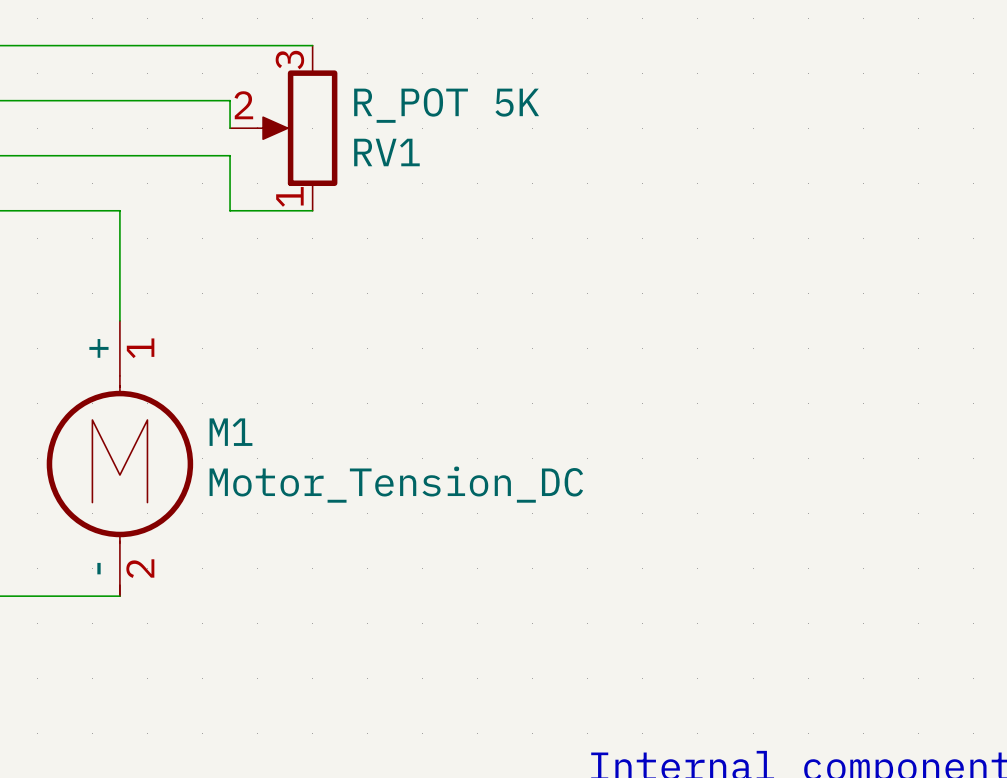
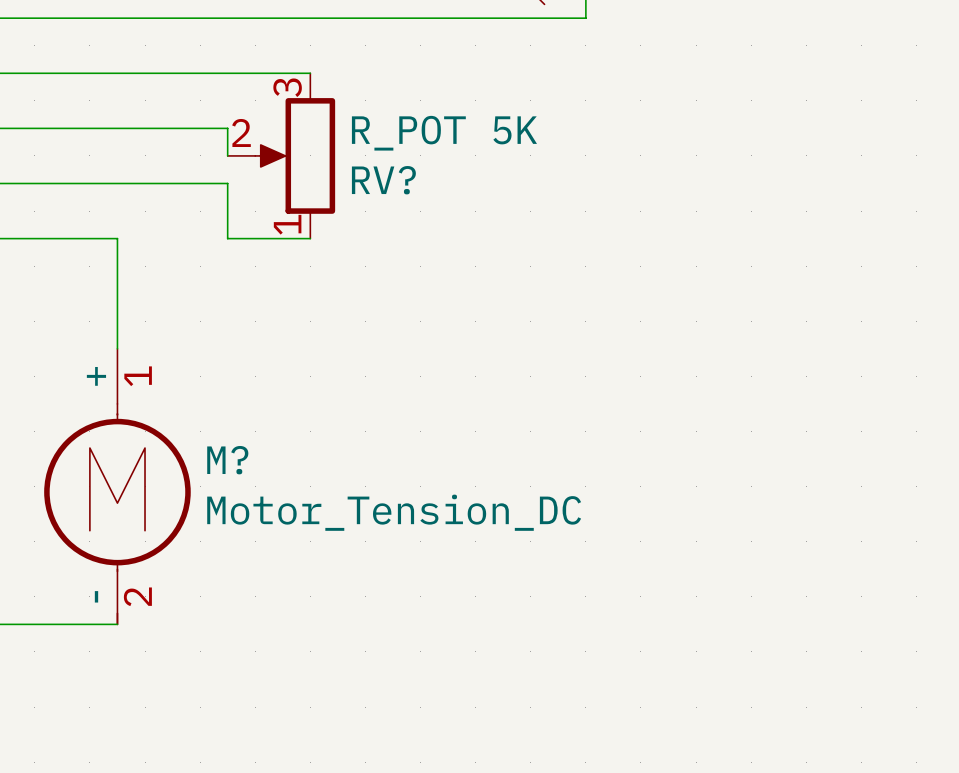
RV1 name: RV1 (386, 152) -> RV? (383, 180)
M1 name: M1 (230, 432) -> M? (227, 460)

